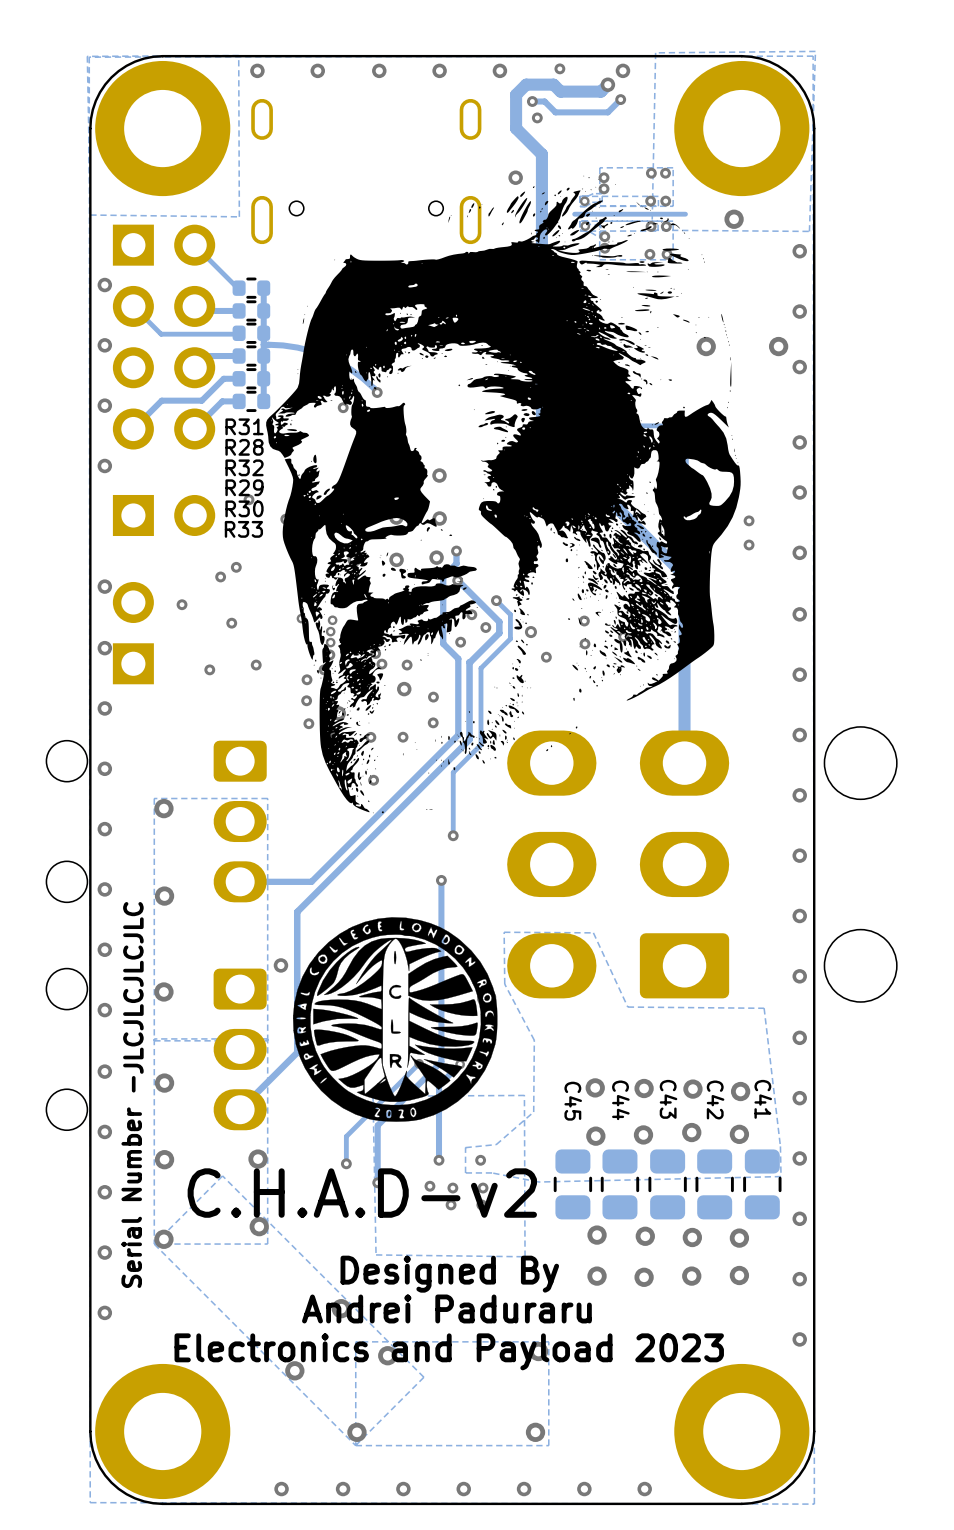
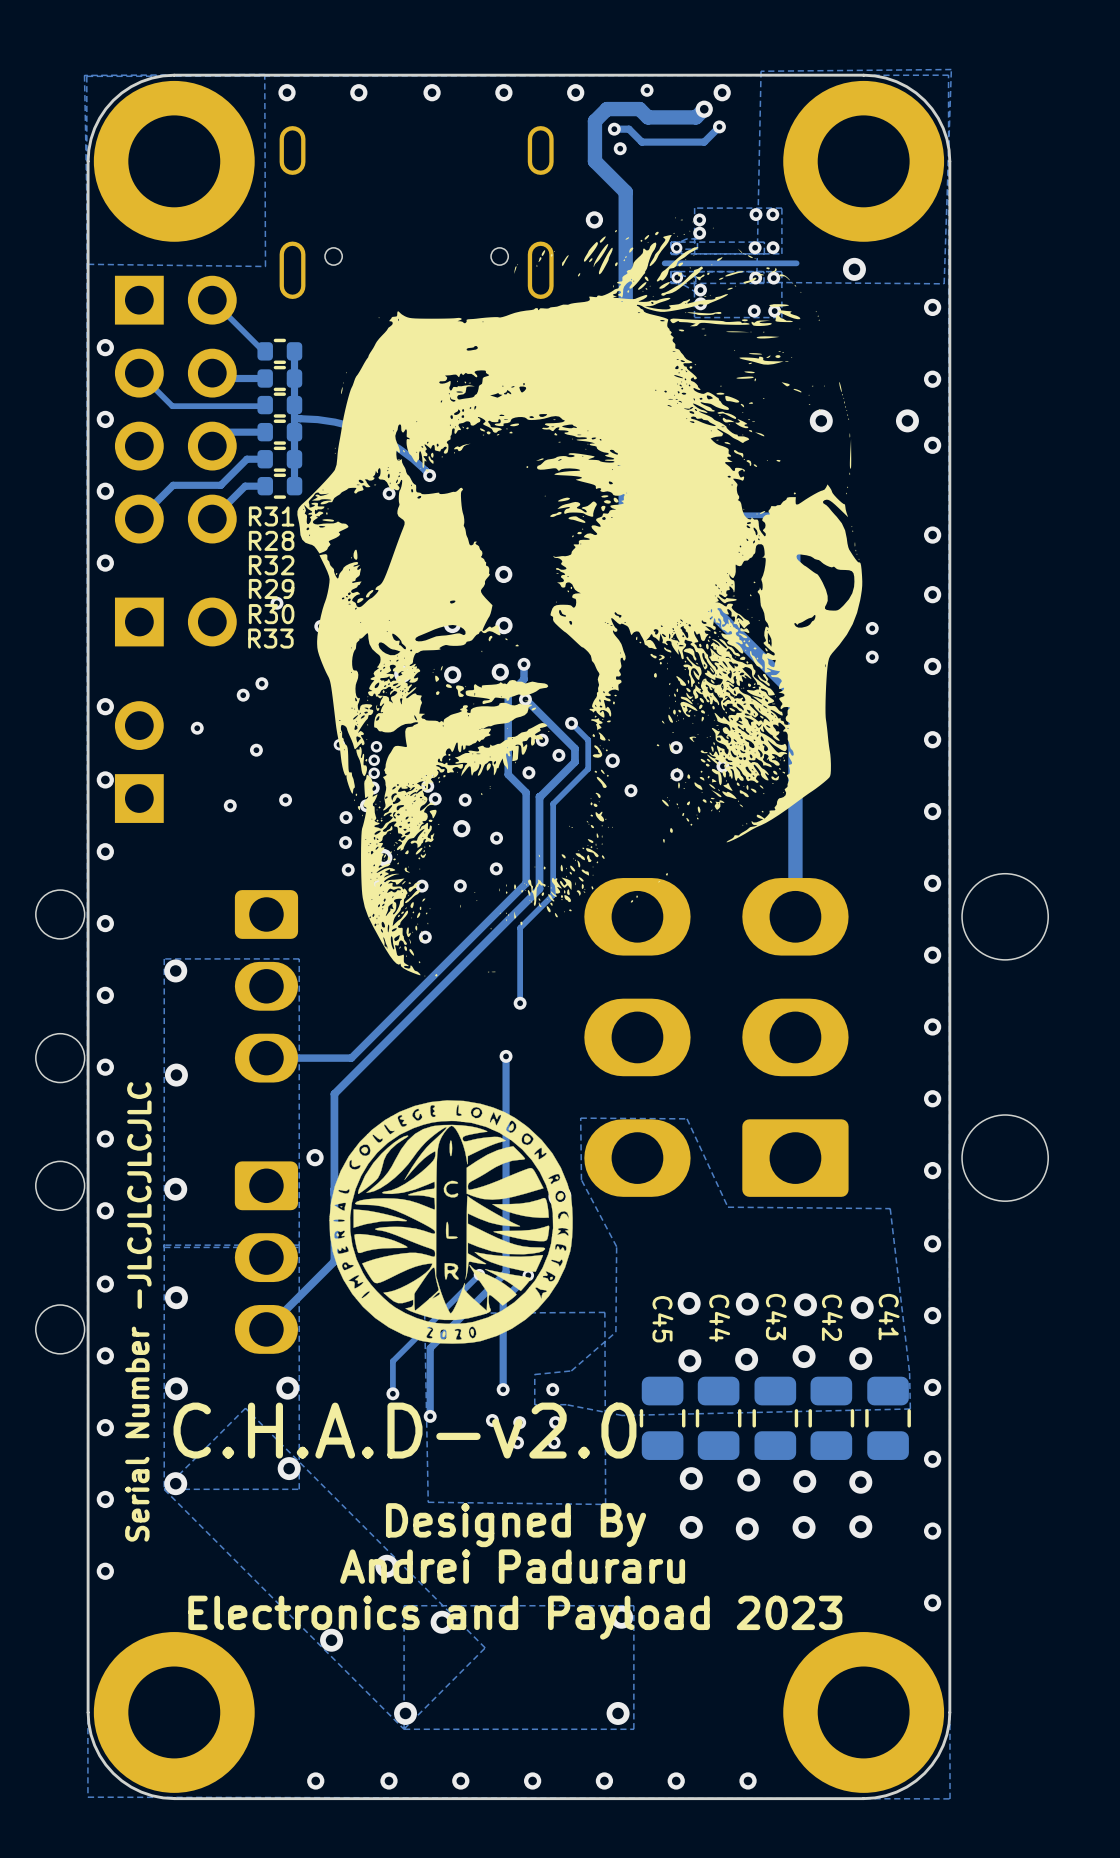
text: C.H.A.D-v2 (362, 1193) -> C.H.A.D-v2.0 (404, 1430)

